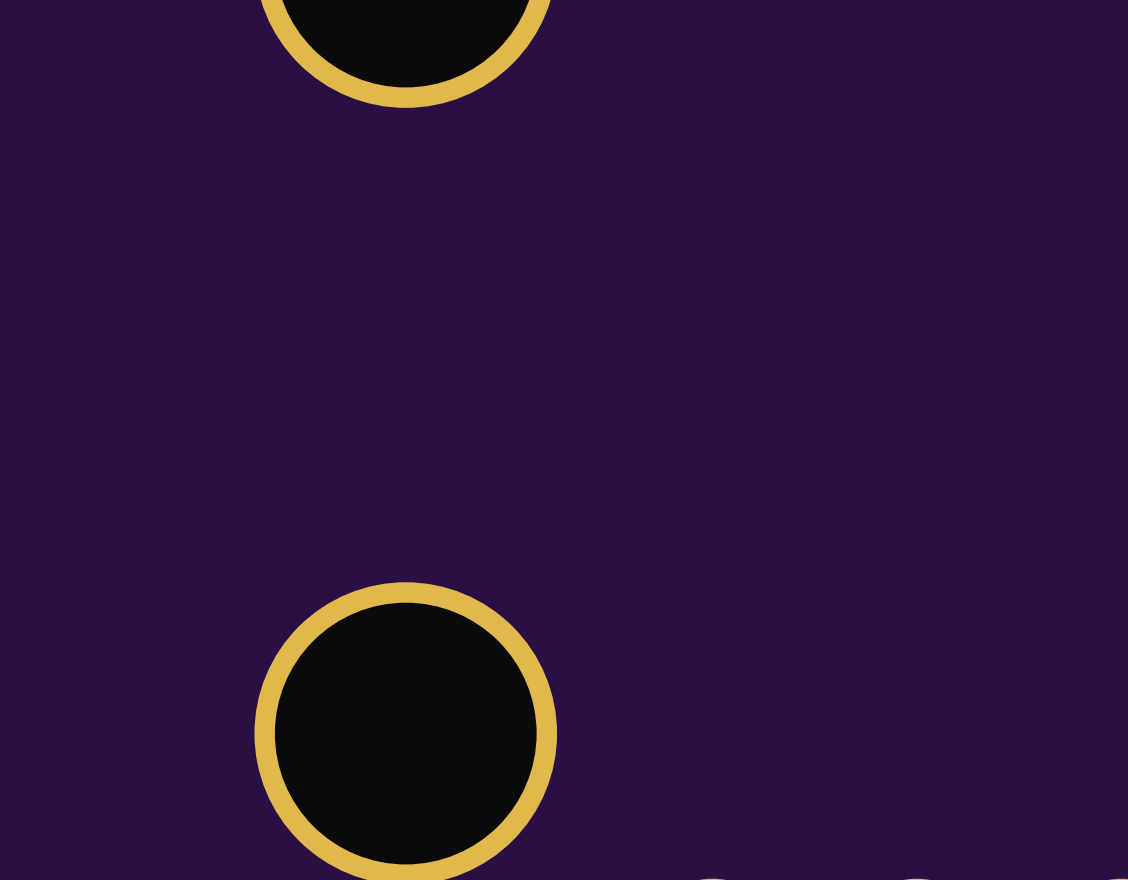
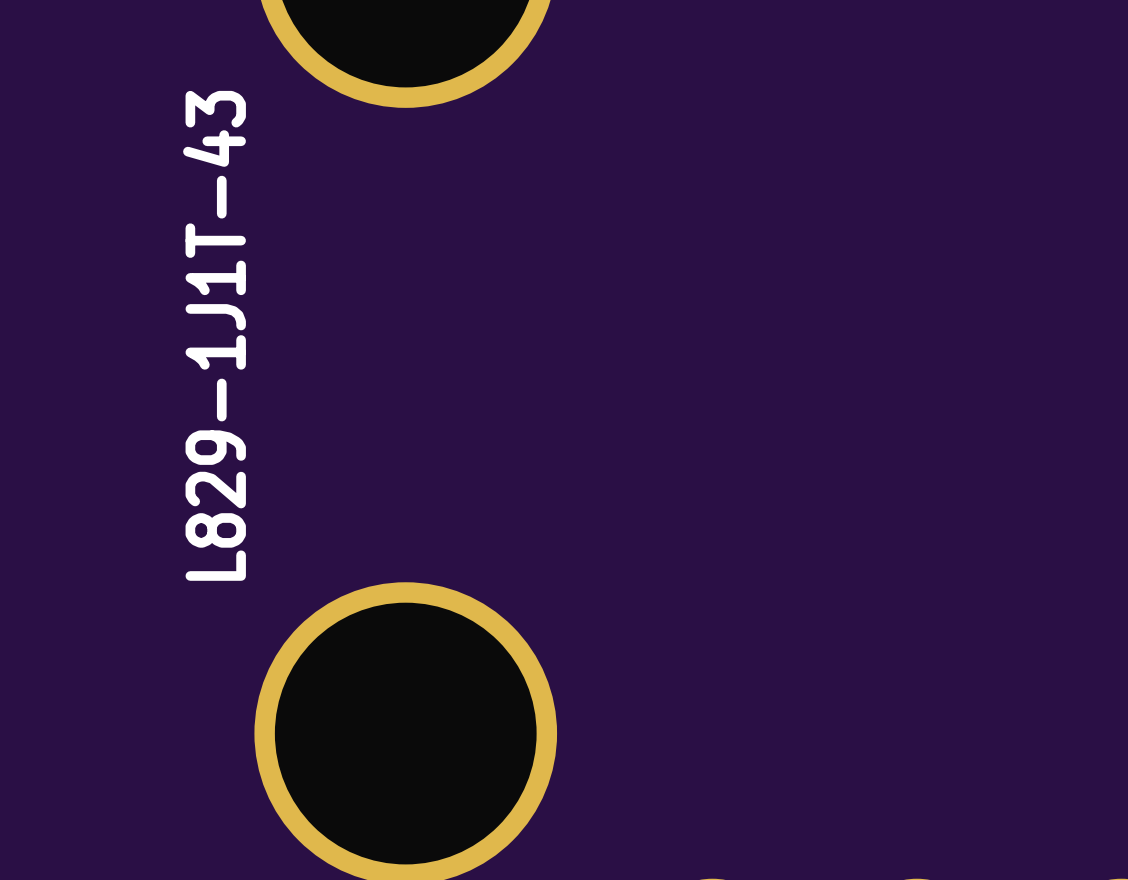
part value: none -> L829-1J1T-43 (214, 335)

